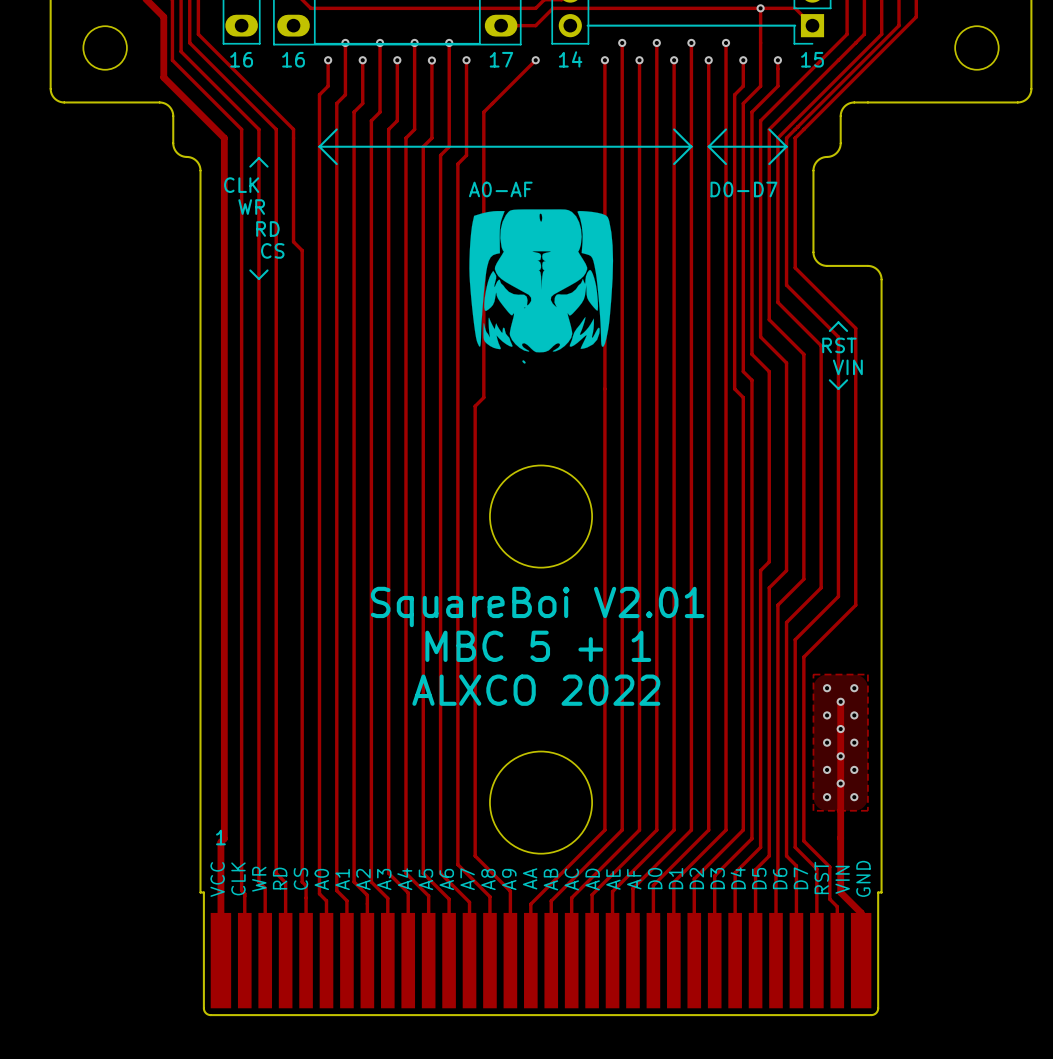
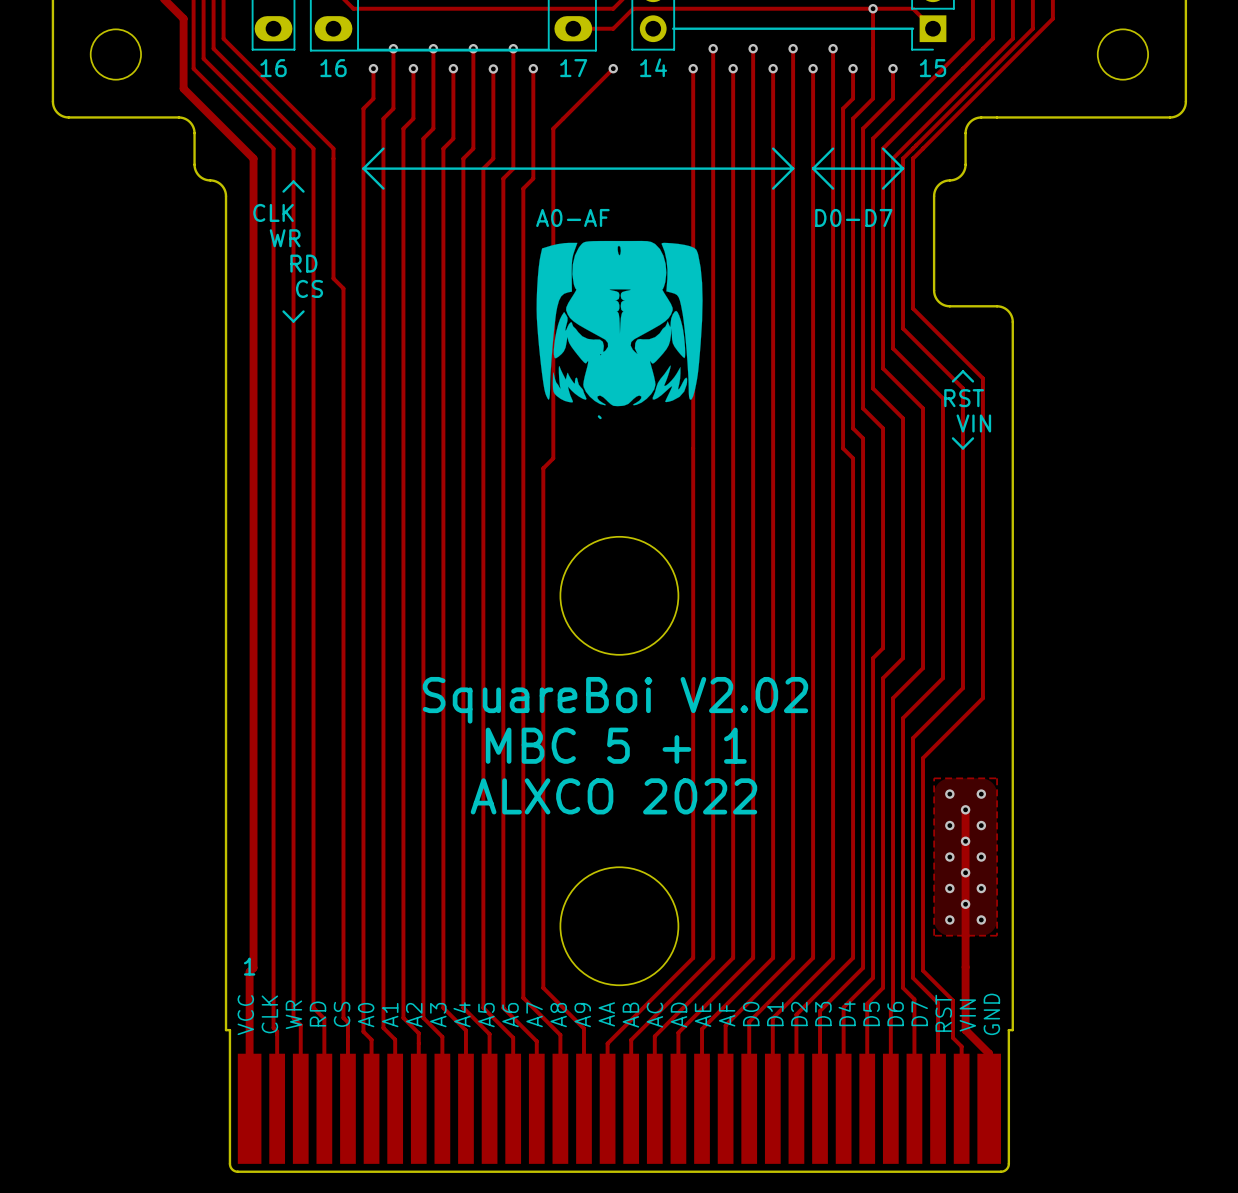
text: SquareBoi V2.01 (537, 606) -> SquareBoi V2.02 (615, 700)

